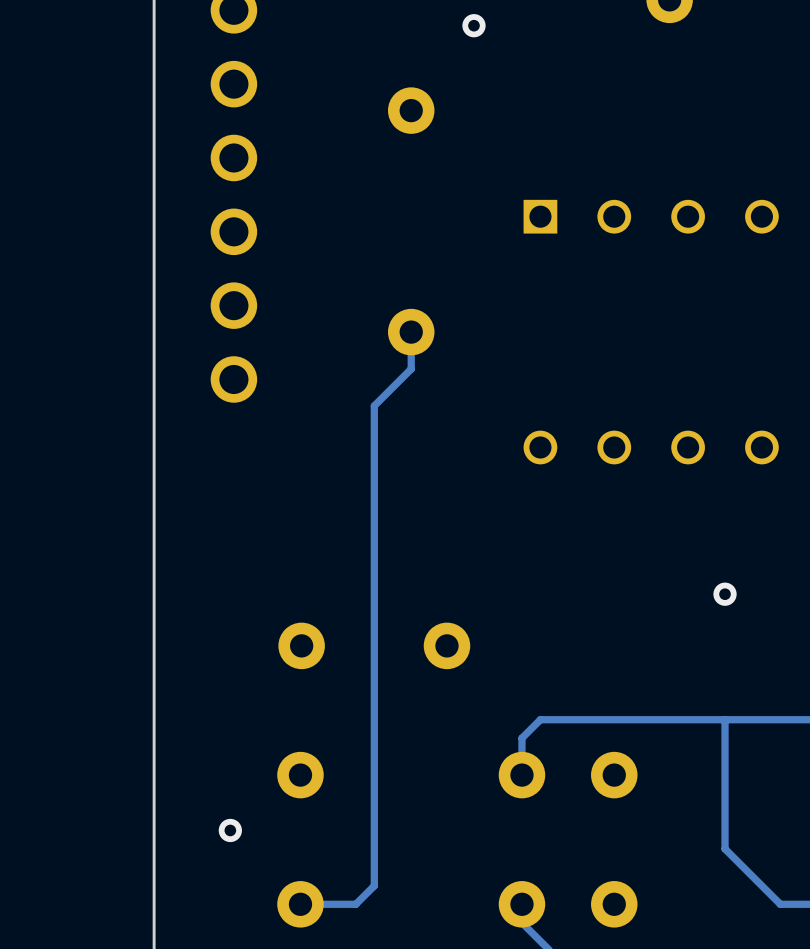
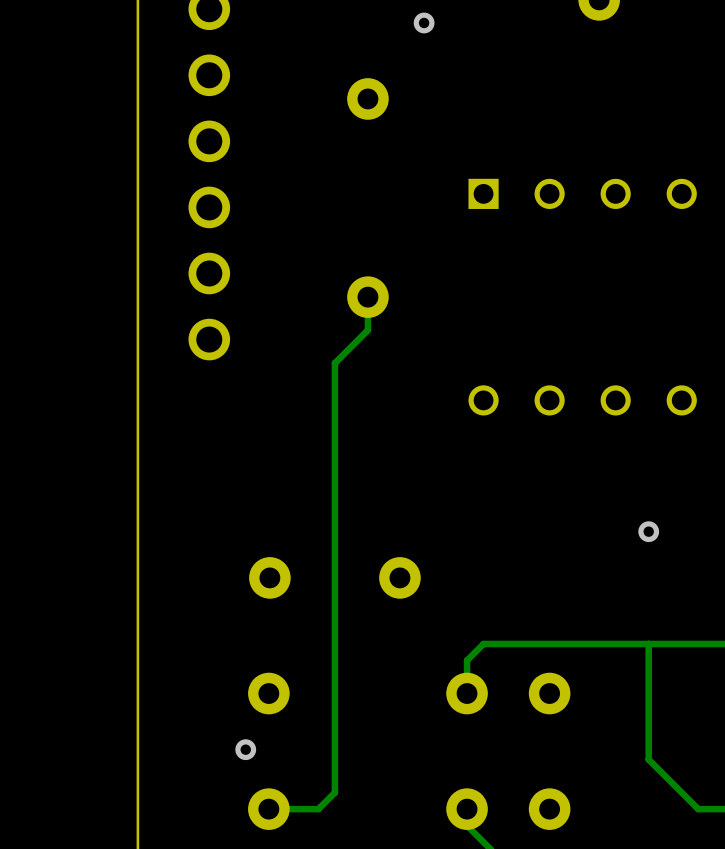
via position: (230, 830) -> (245, 749)

